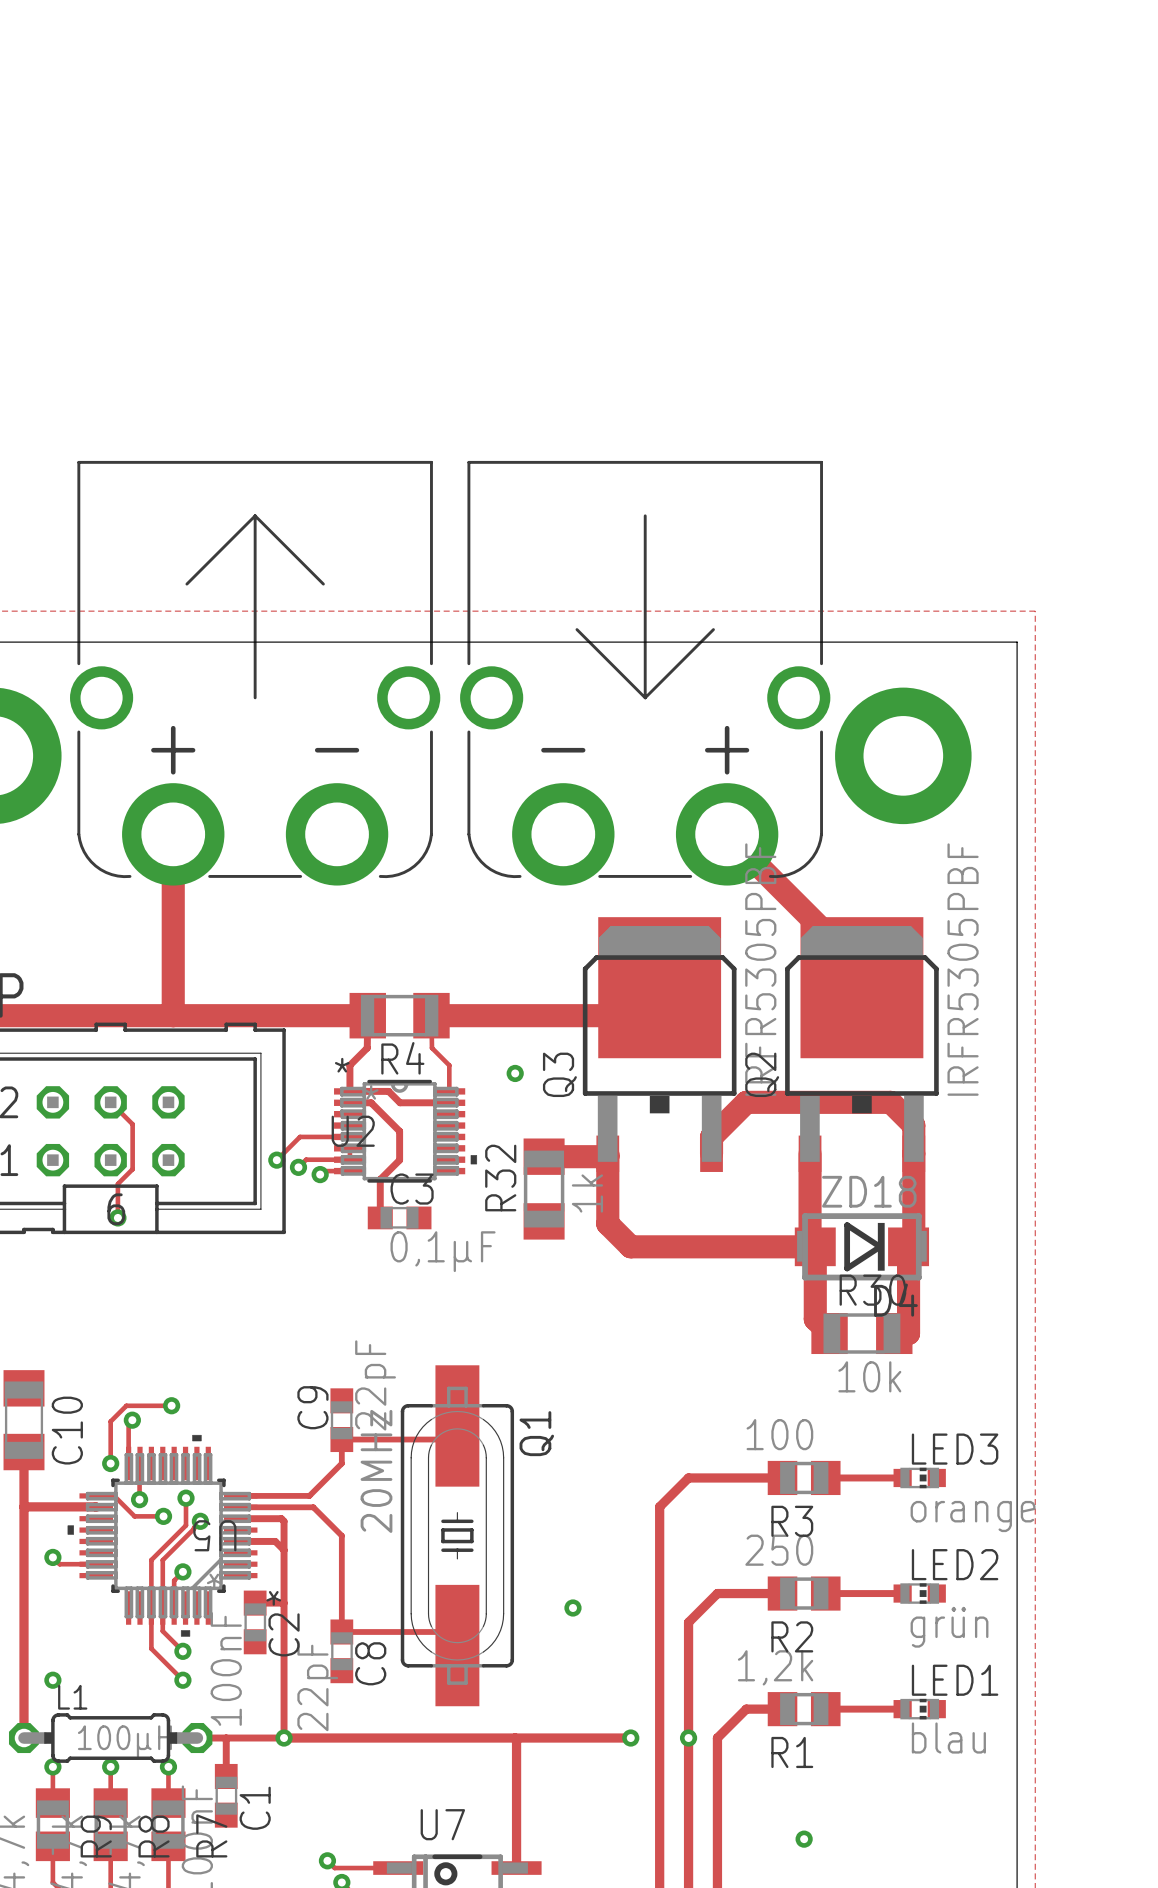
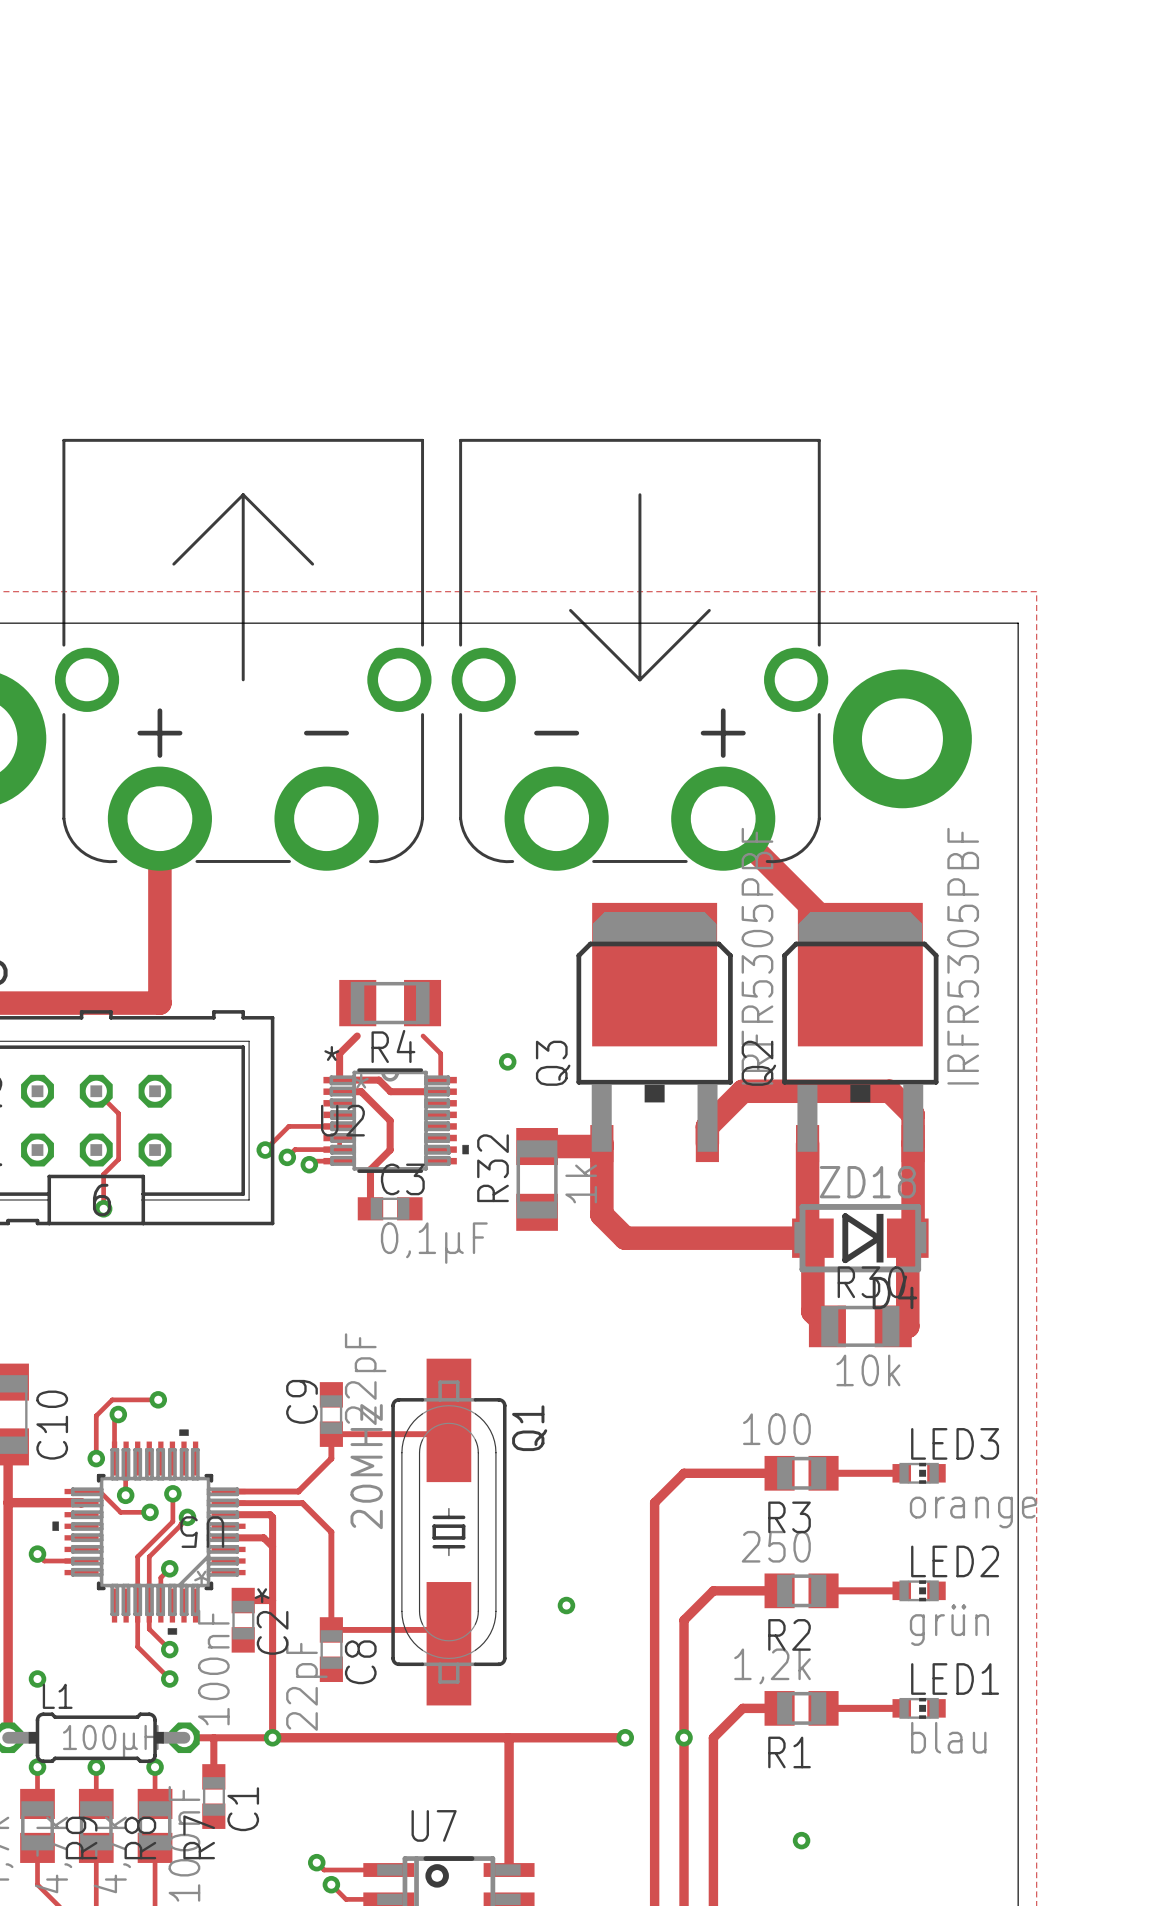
track: (173, 1015) (367, 1015) (367, 1048) -> none
track: (631, 1015) (431, 1015) (431, 1048) -> none

